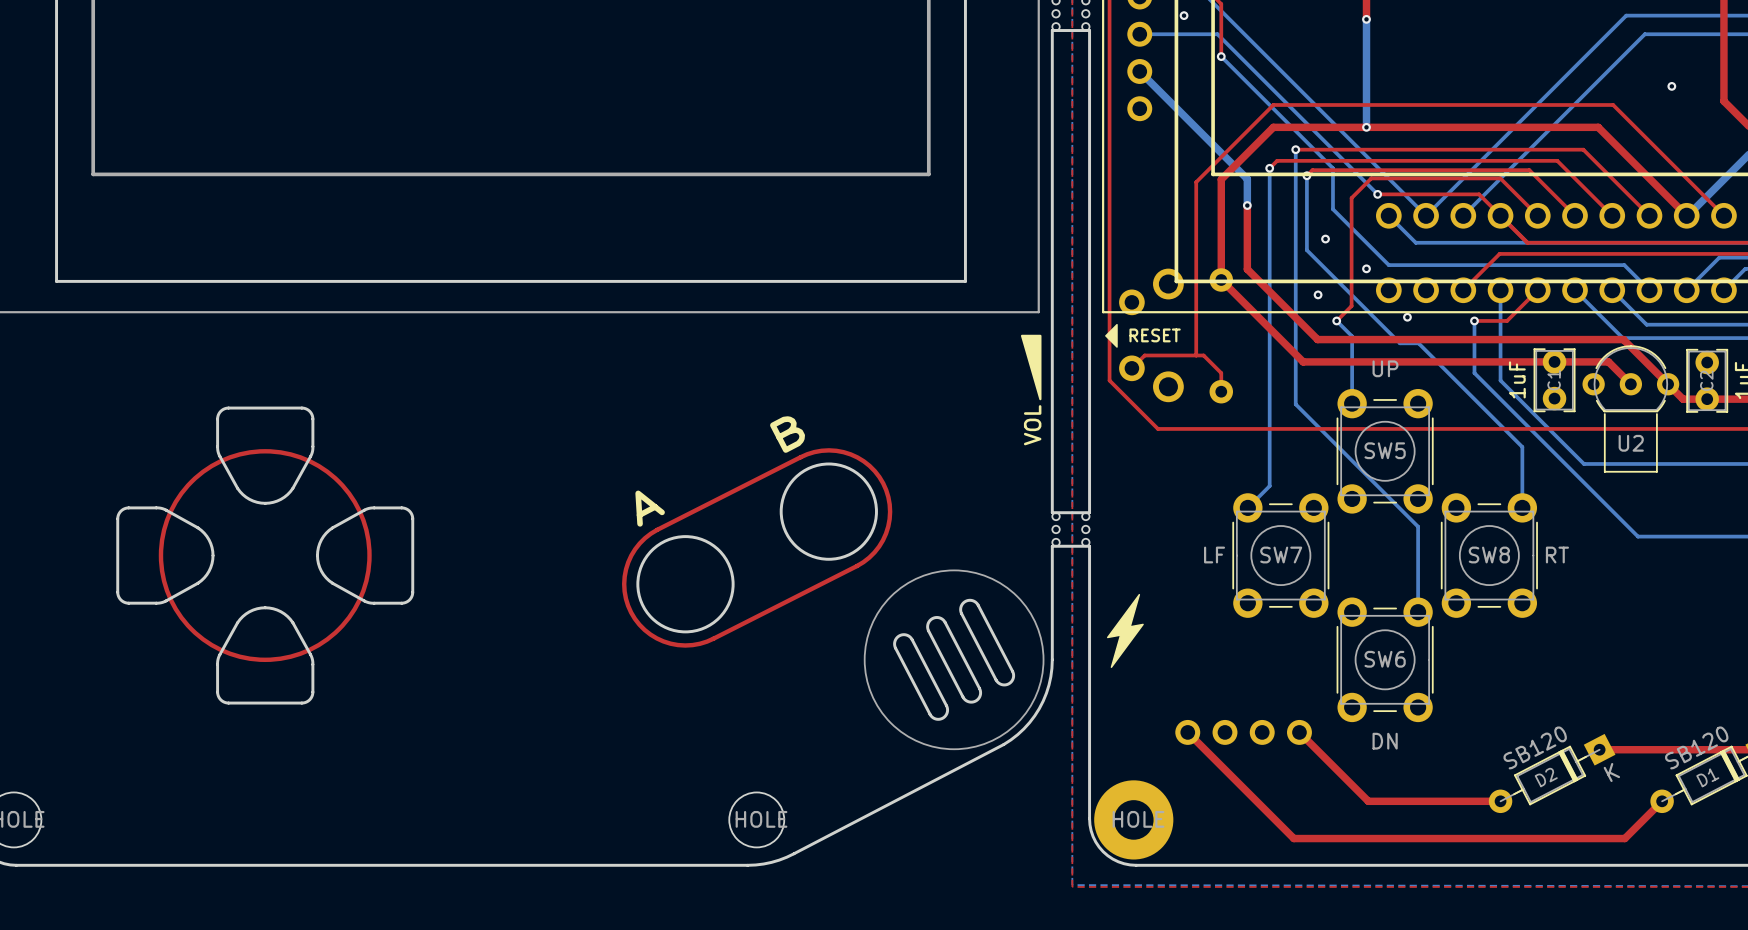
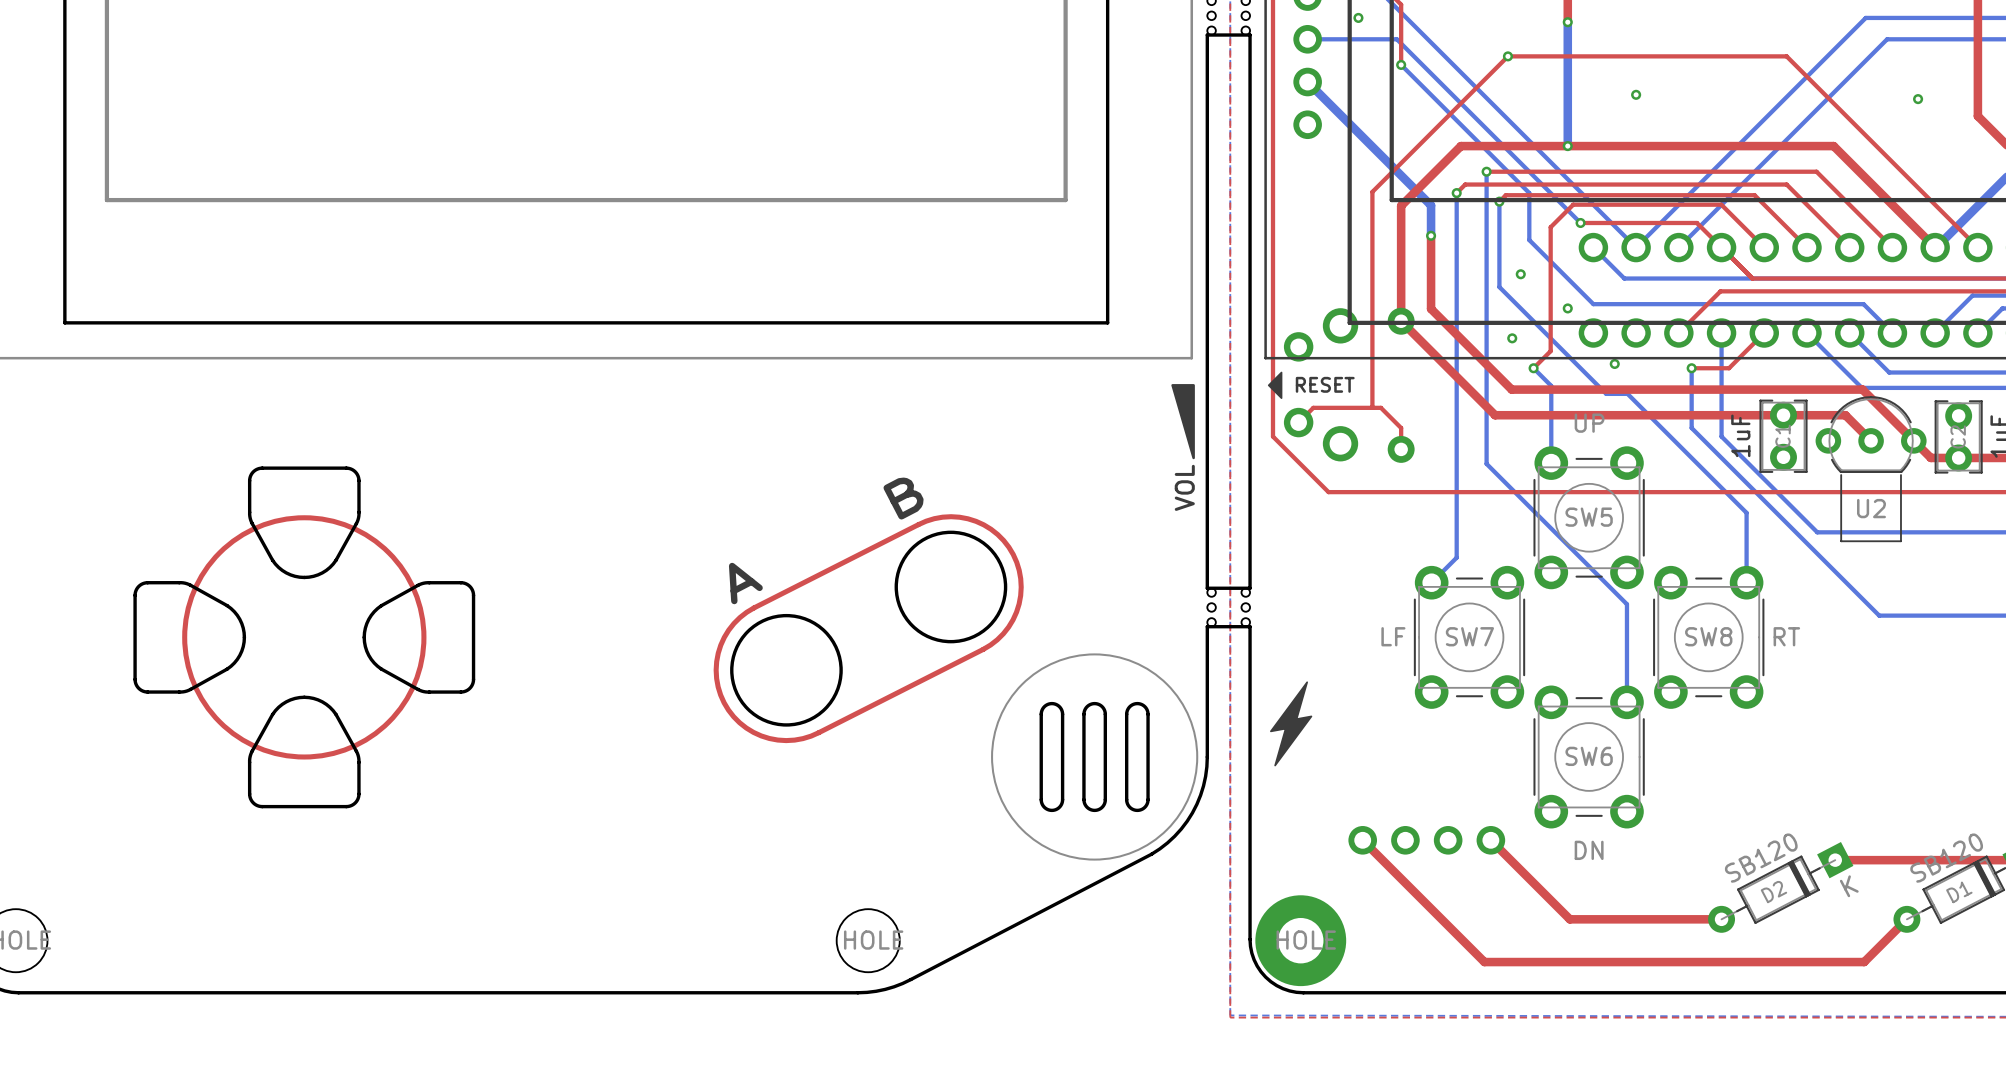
via: none -> (1507, 56)
via: none -> (1636, 94)
top track: (1613, 104) (1273, 104) (1196, 182) -> (1850, 120) (1786, 56) (1507, 56) (1372, 191) (1372, 209)
drawing shape: [863, 569, 1045, 751] -> [991, 653, 1199, 861]

